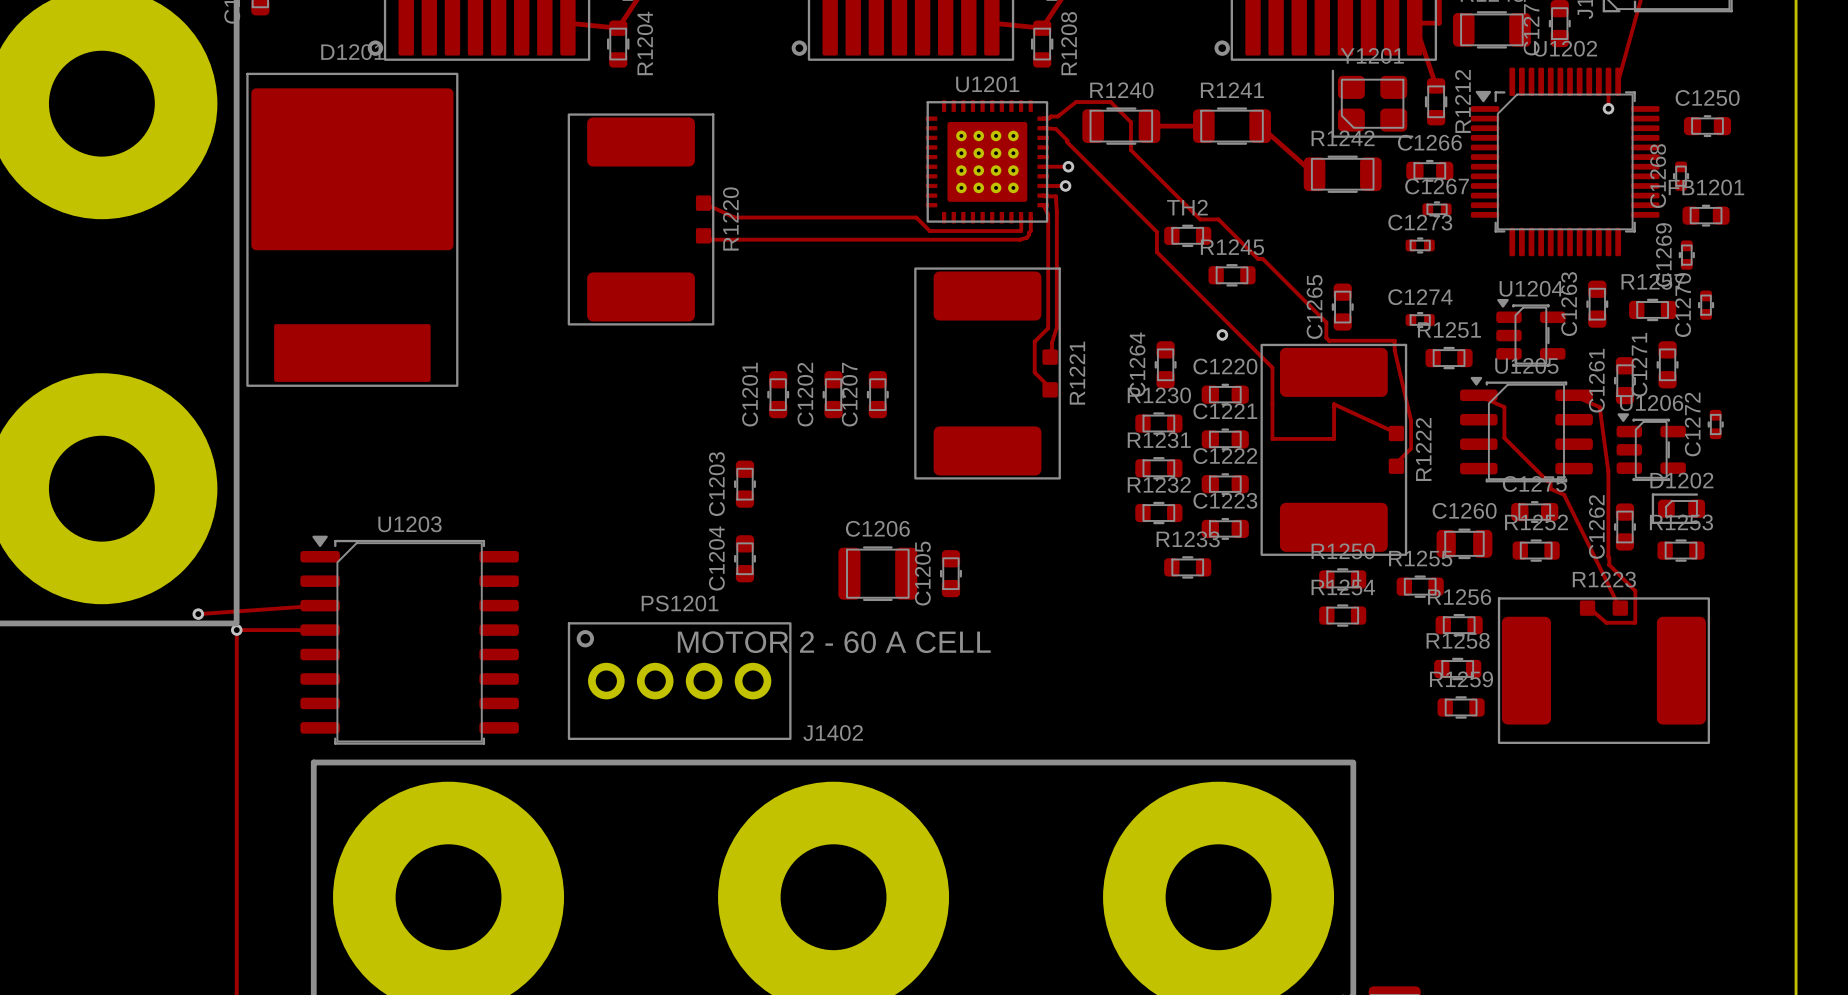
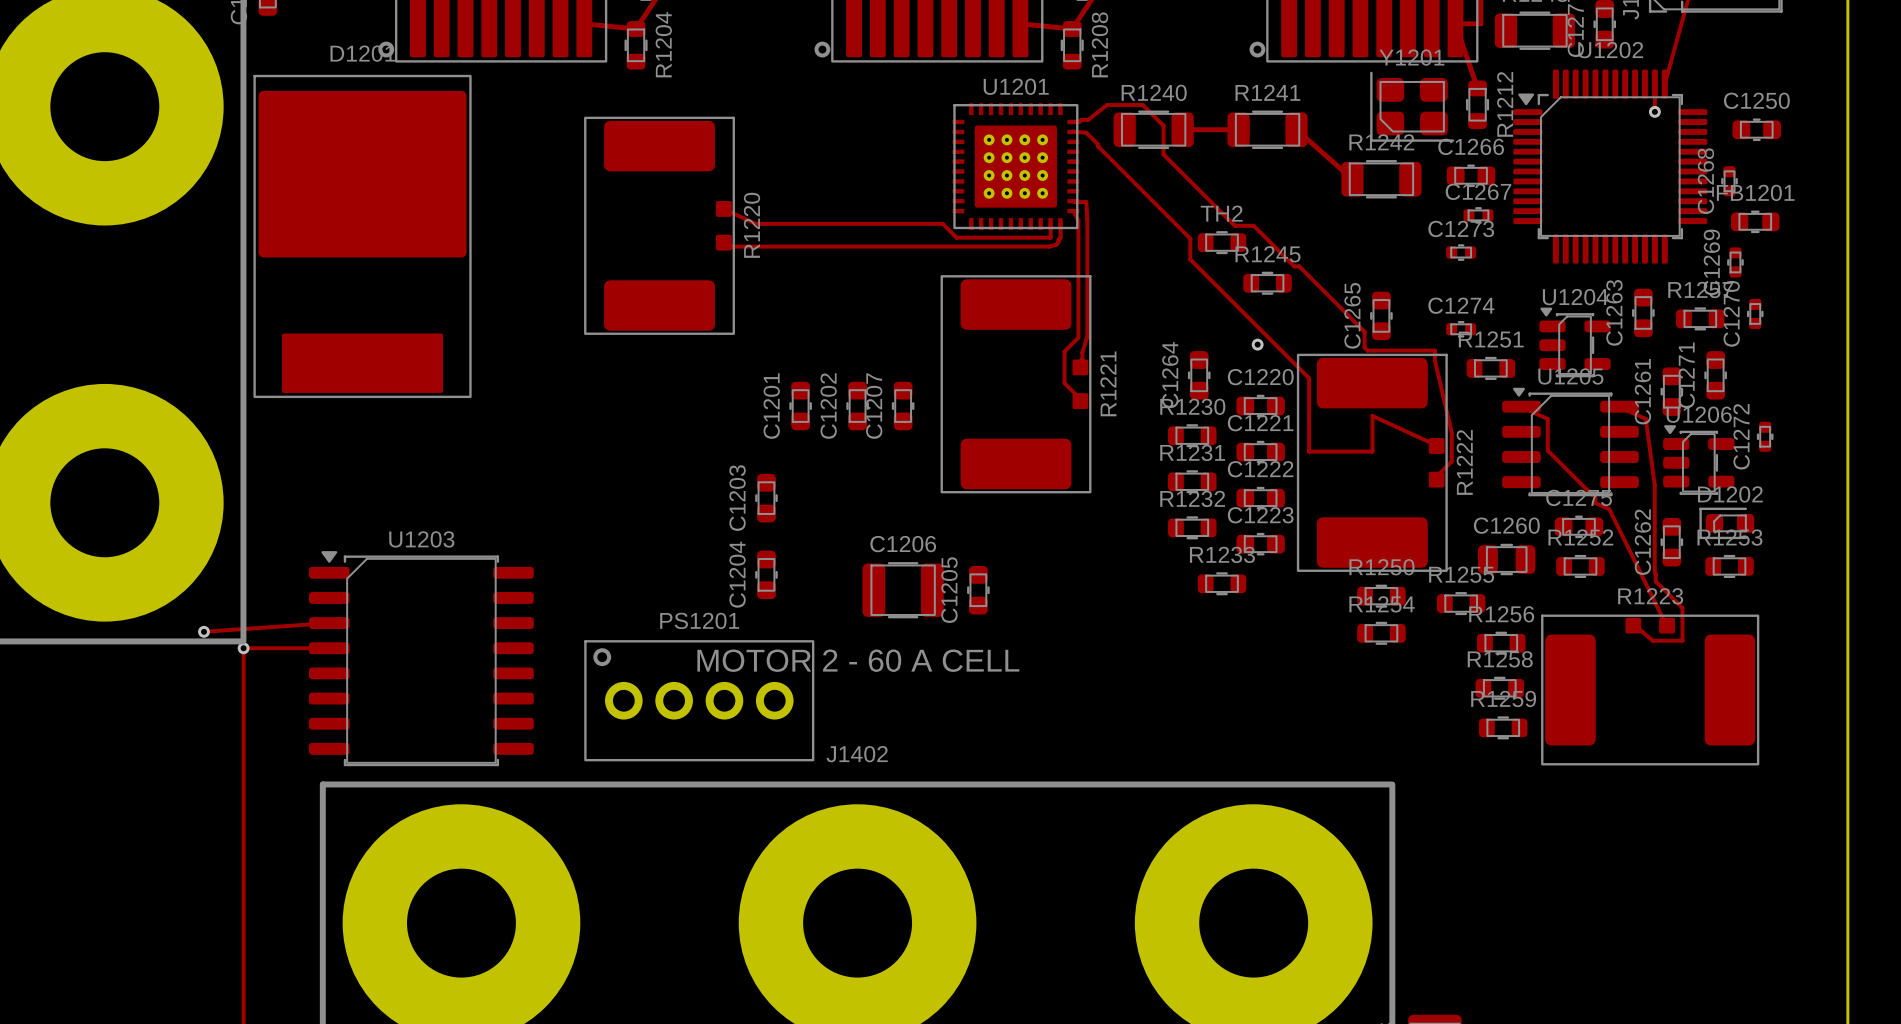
track: (1043, 166) (1068, 166) -> none
via: (1068, 166) -> none
track: (1043, 185) (1065, 185) -> none
via: (1065, 185) -> none

